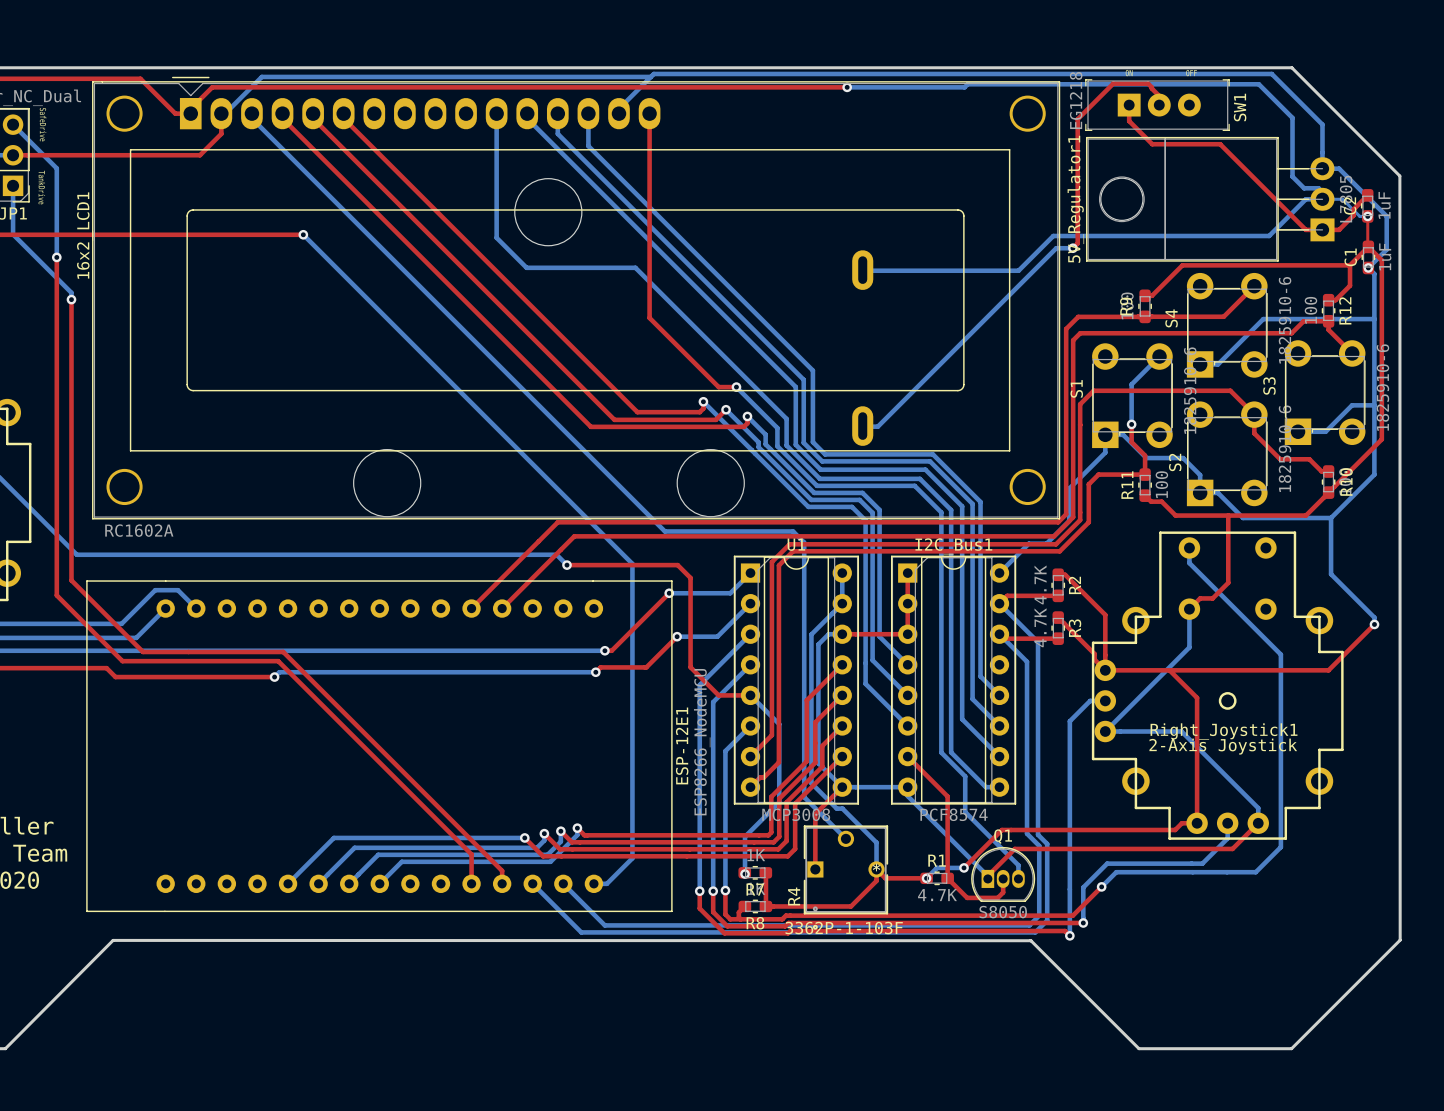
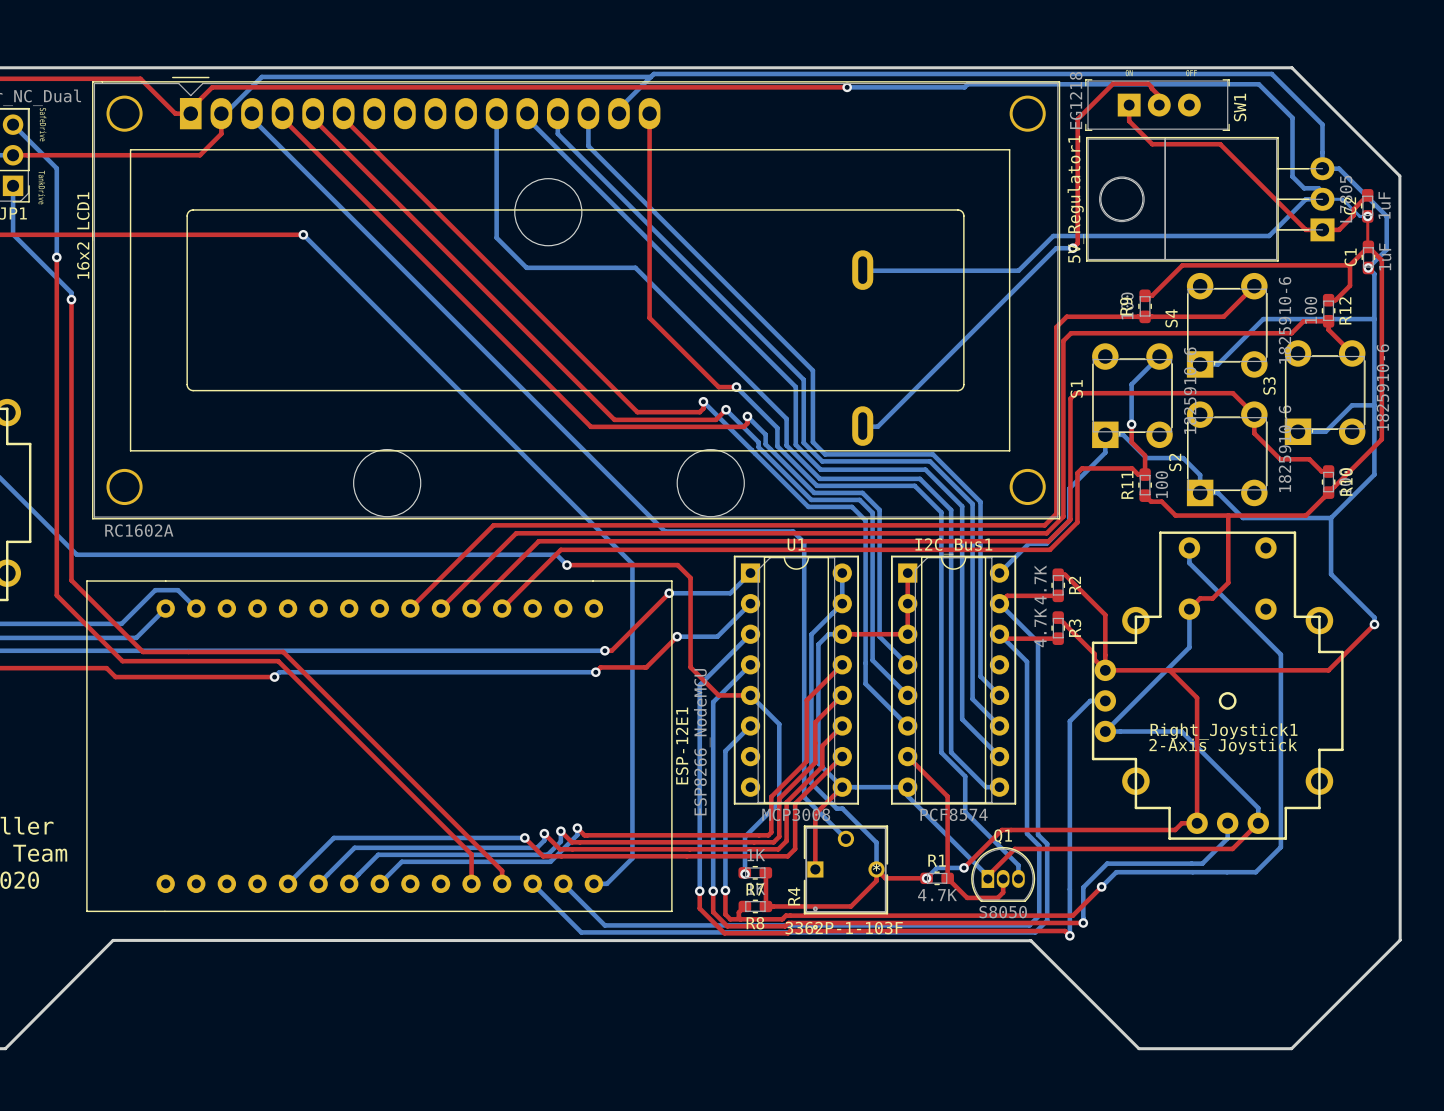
top track: (1138, 316) (1078, 316) (1066, 328) (1066, 514) (1058, 522) (557, 522) (538, 541) -> (1232, 393) (1075, 393) (1070, 398) (1070, 519) (1048, 541) (538, 541)
top track: none -> (1138, 316) (1066, 316) (1056, 327) (1056, 513) (1044, 525) (493, 525) (410, 608)
top track: (1080, 333) (1073, 340) (1073, 517) (1054, 536) (574, 536) (560, 549) -> (1080, 333) (1071, 333) (1063, 340) (1063, 516) (1046, 533) (516, 533) (440, 608)
top track: (1232, 393) (1230, 390) (1093, 390) (1080, 404) (1080, 520) (1055, 544) (789, 544) (771, 562) (771, 735) (750, 756) -> none
top track: (1138, 474) (1098, 474) (1088, 484) (1088, 522) (1059, 551) (793, 551) (778, 565) (778, 762) (750, 787) -> (1138, 474) (1132, 468) (1082, 468) (1077, 473) (1077, 522) (1049, 549) (560, 549)

